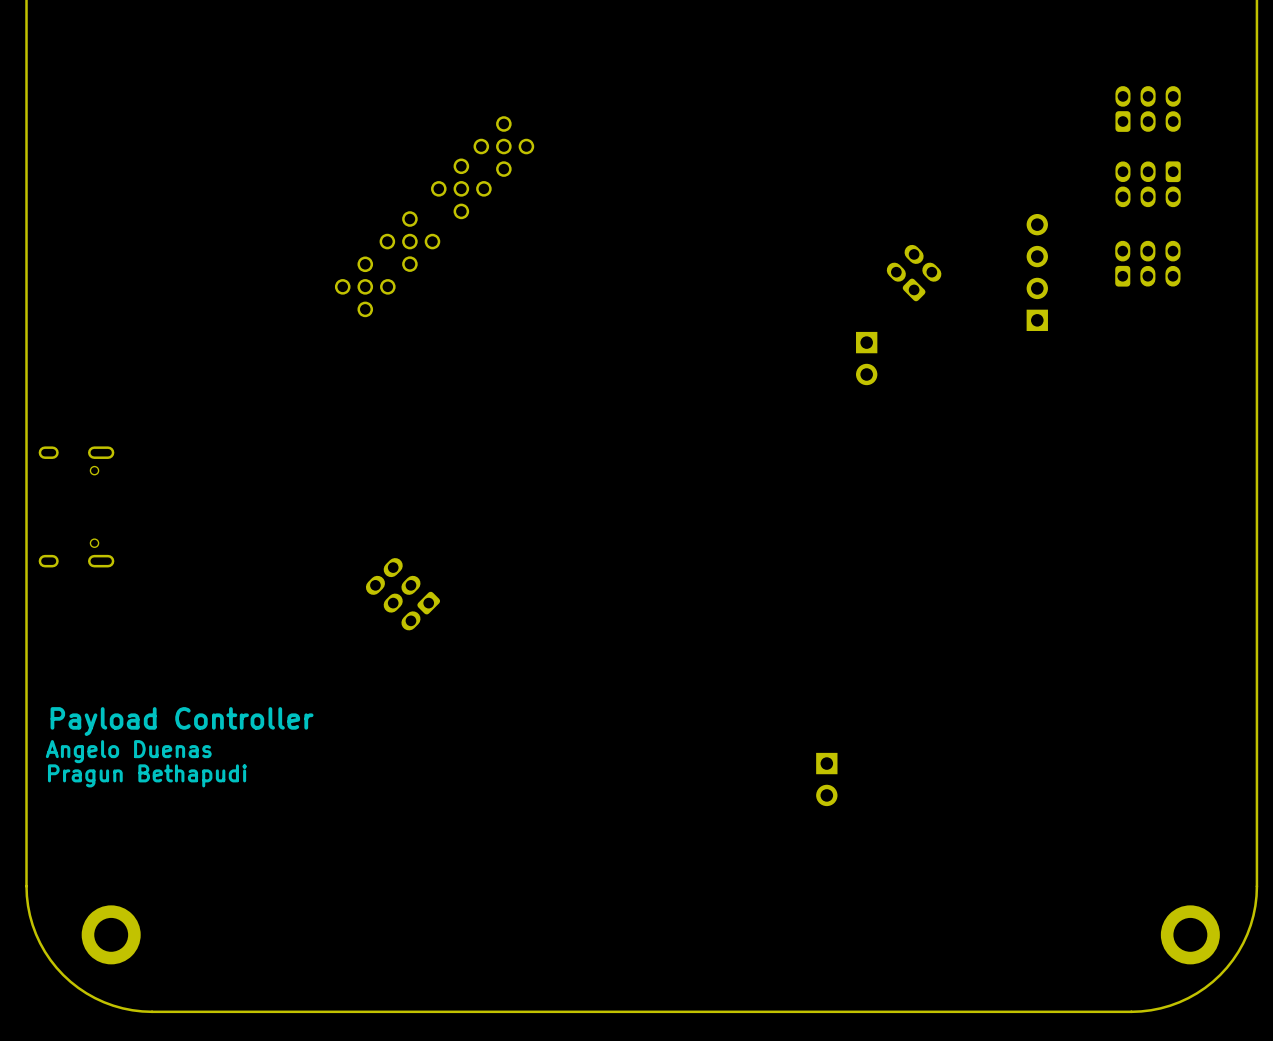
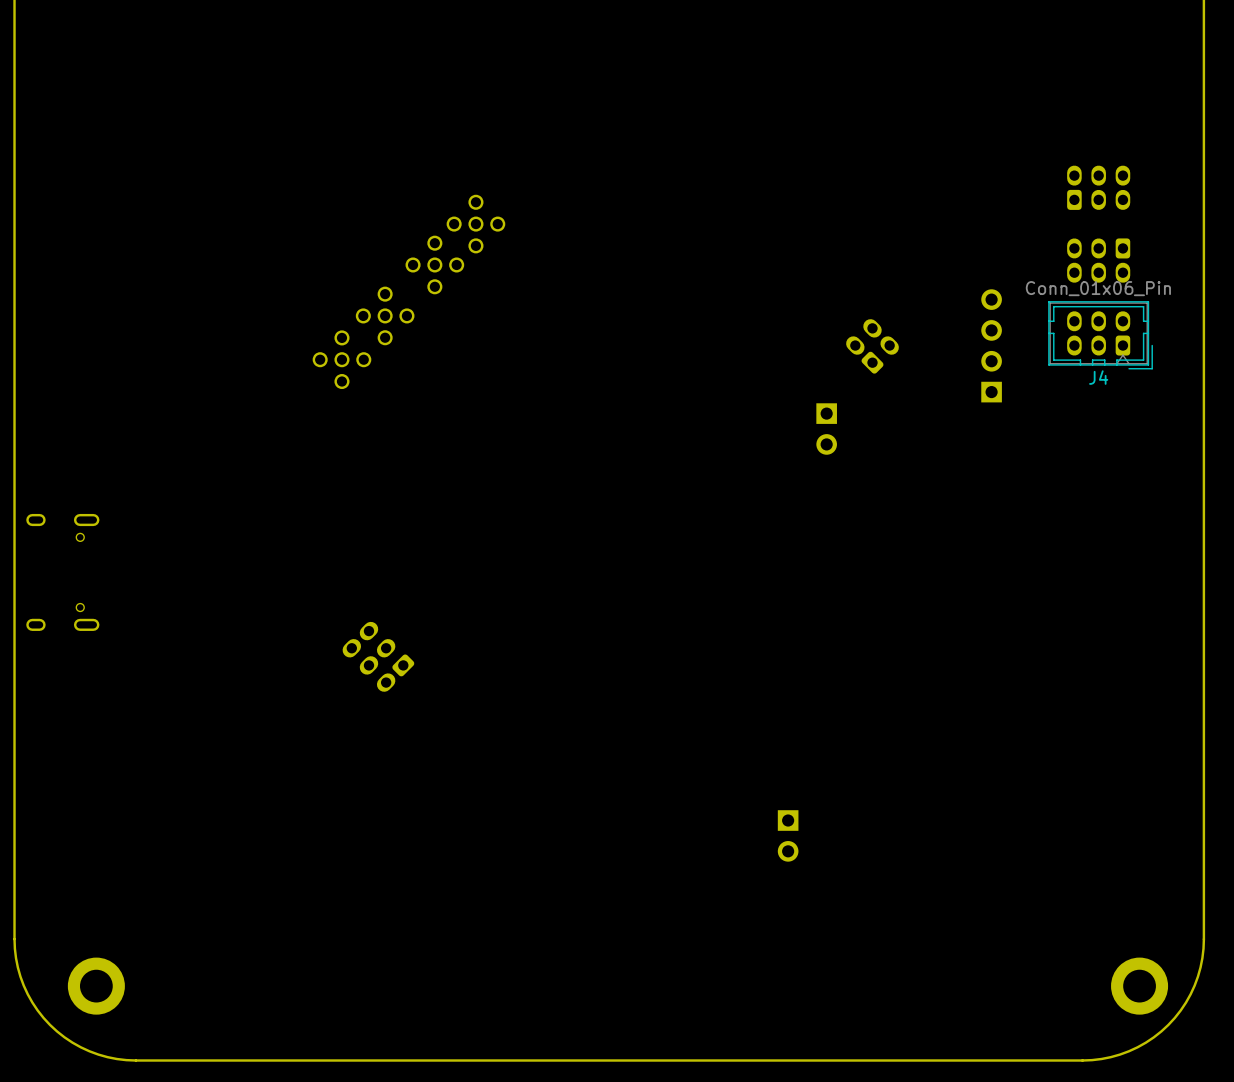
J4 side: top (1147, 263) -> bottom (1100, 335)
text: Payload Controller (182, 721) -> none
text: Angelo Duenas (128, 751) -> none
text: Pragun Bethapudi (147, 775) -> none

